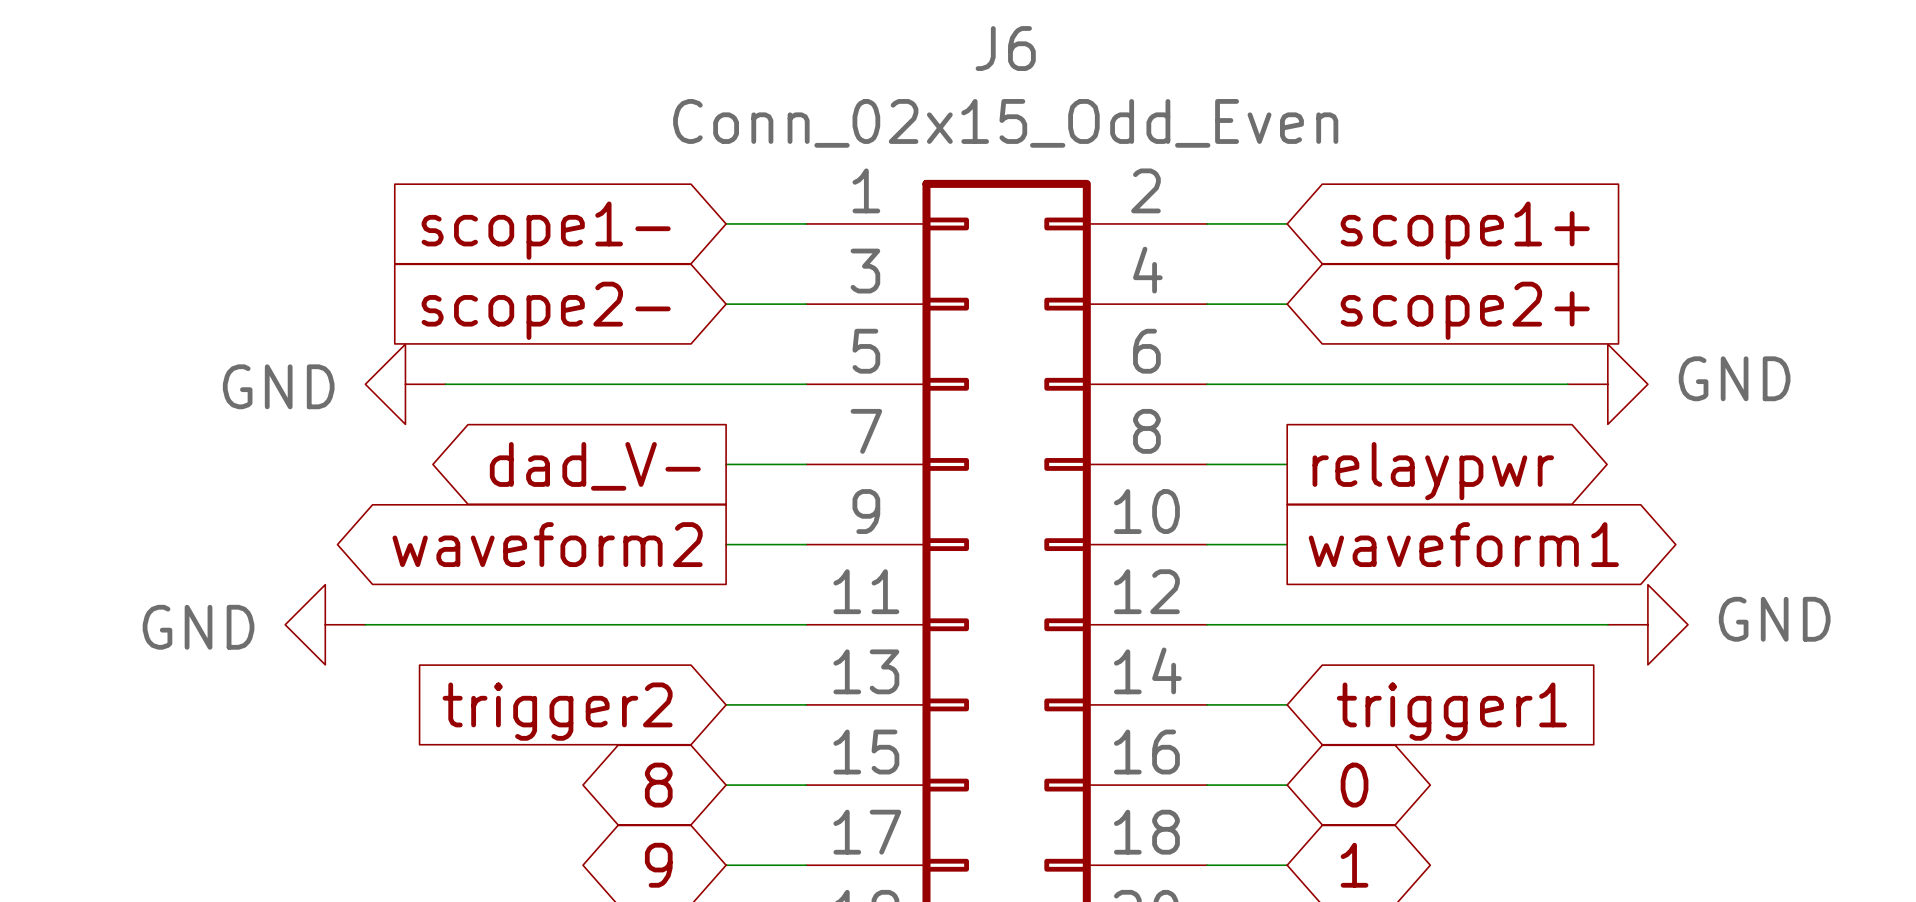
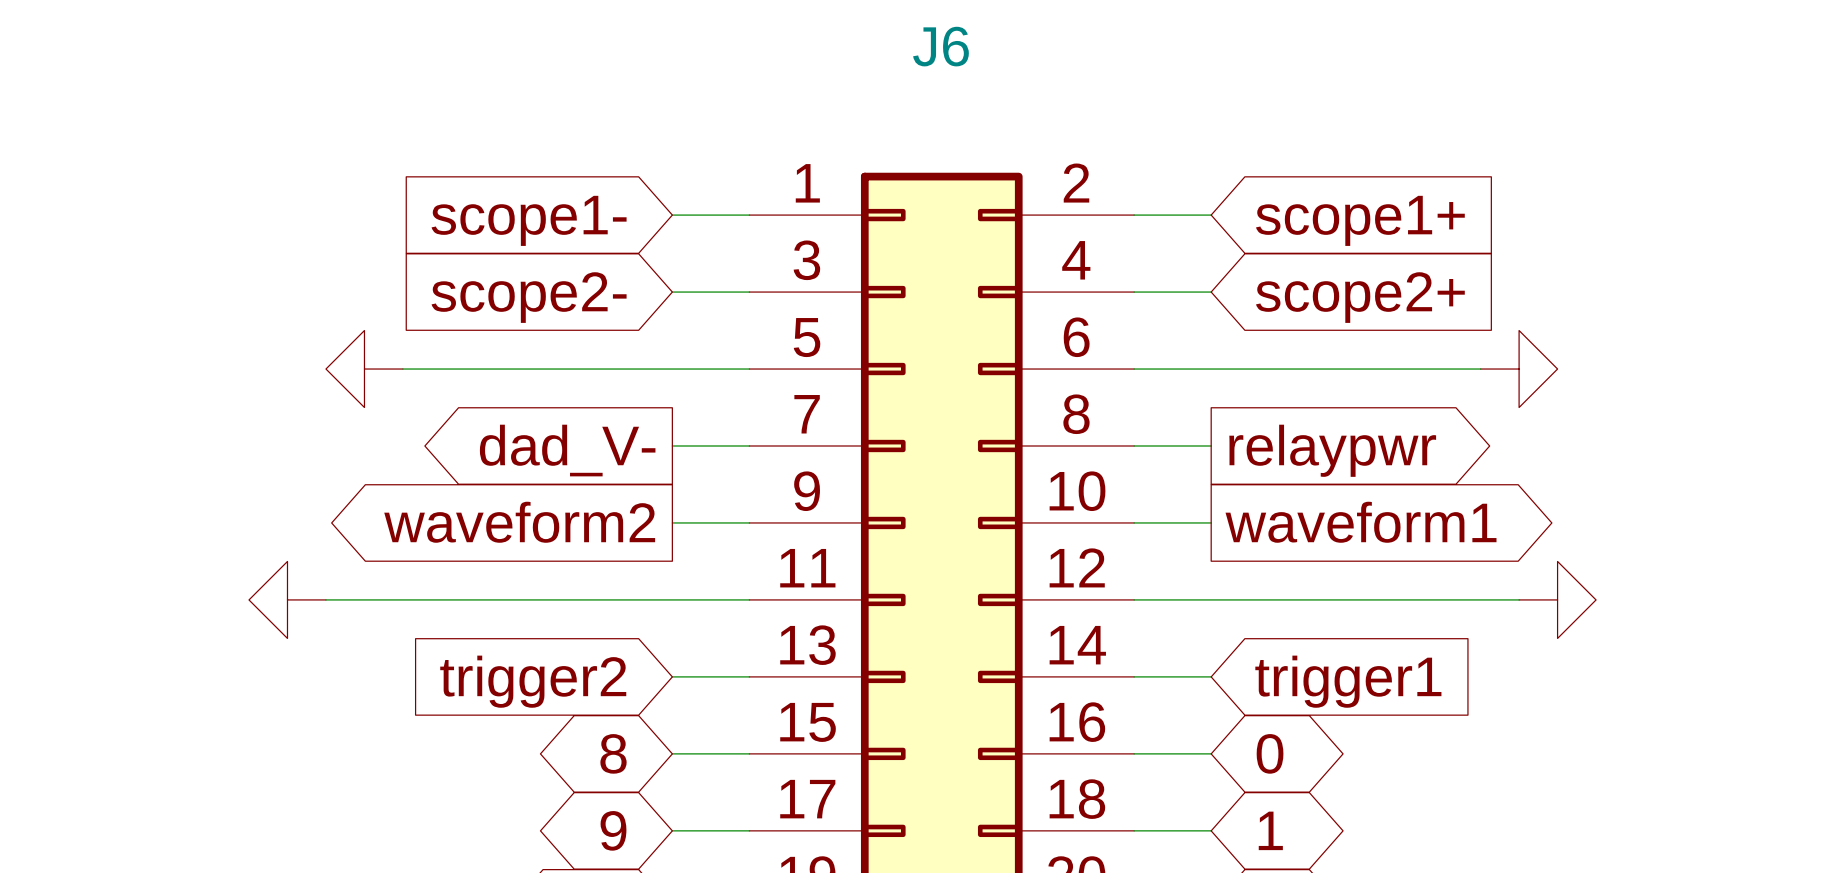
J6 value: Conn_02x15_Odd_Even (1005, 123) -> none
power symbol text: GND (1734, 378) -> none
power symbol text: GND (278, 386) -> none
power symbol text: GND (1774, 619) -> none
power symbol text: GND (198, 627) -> none

